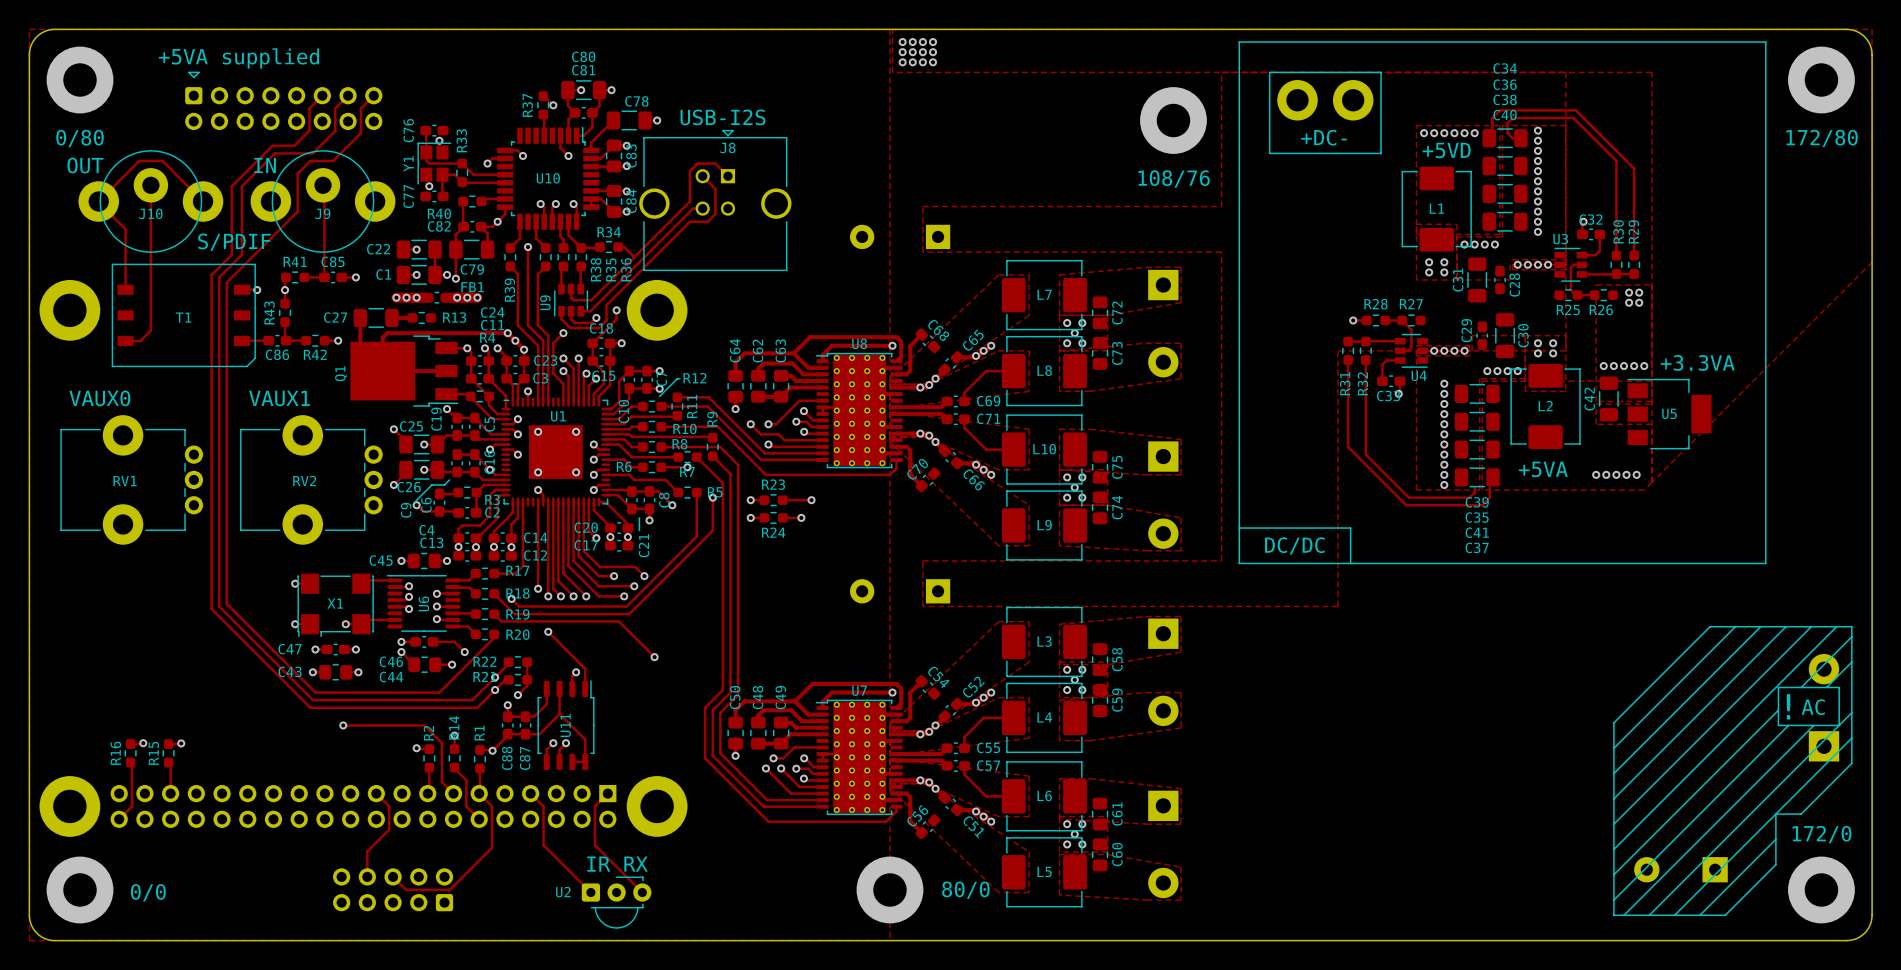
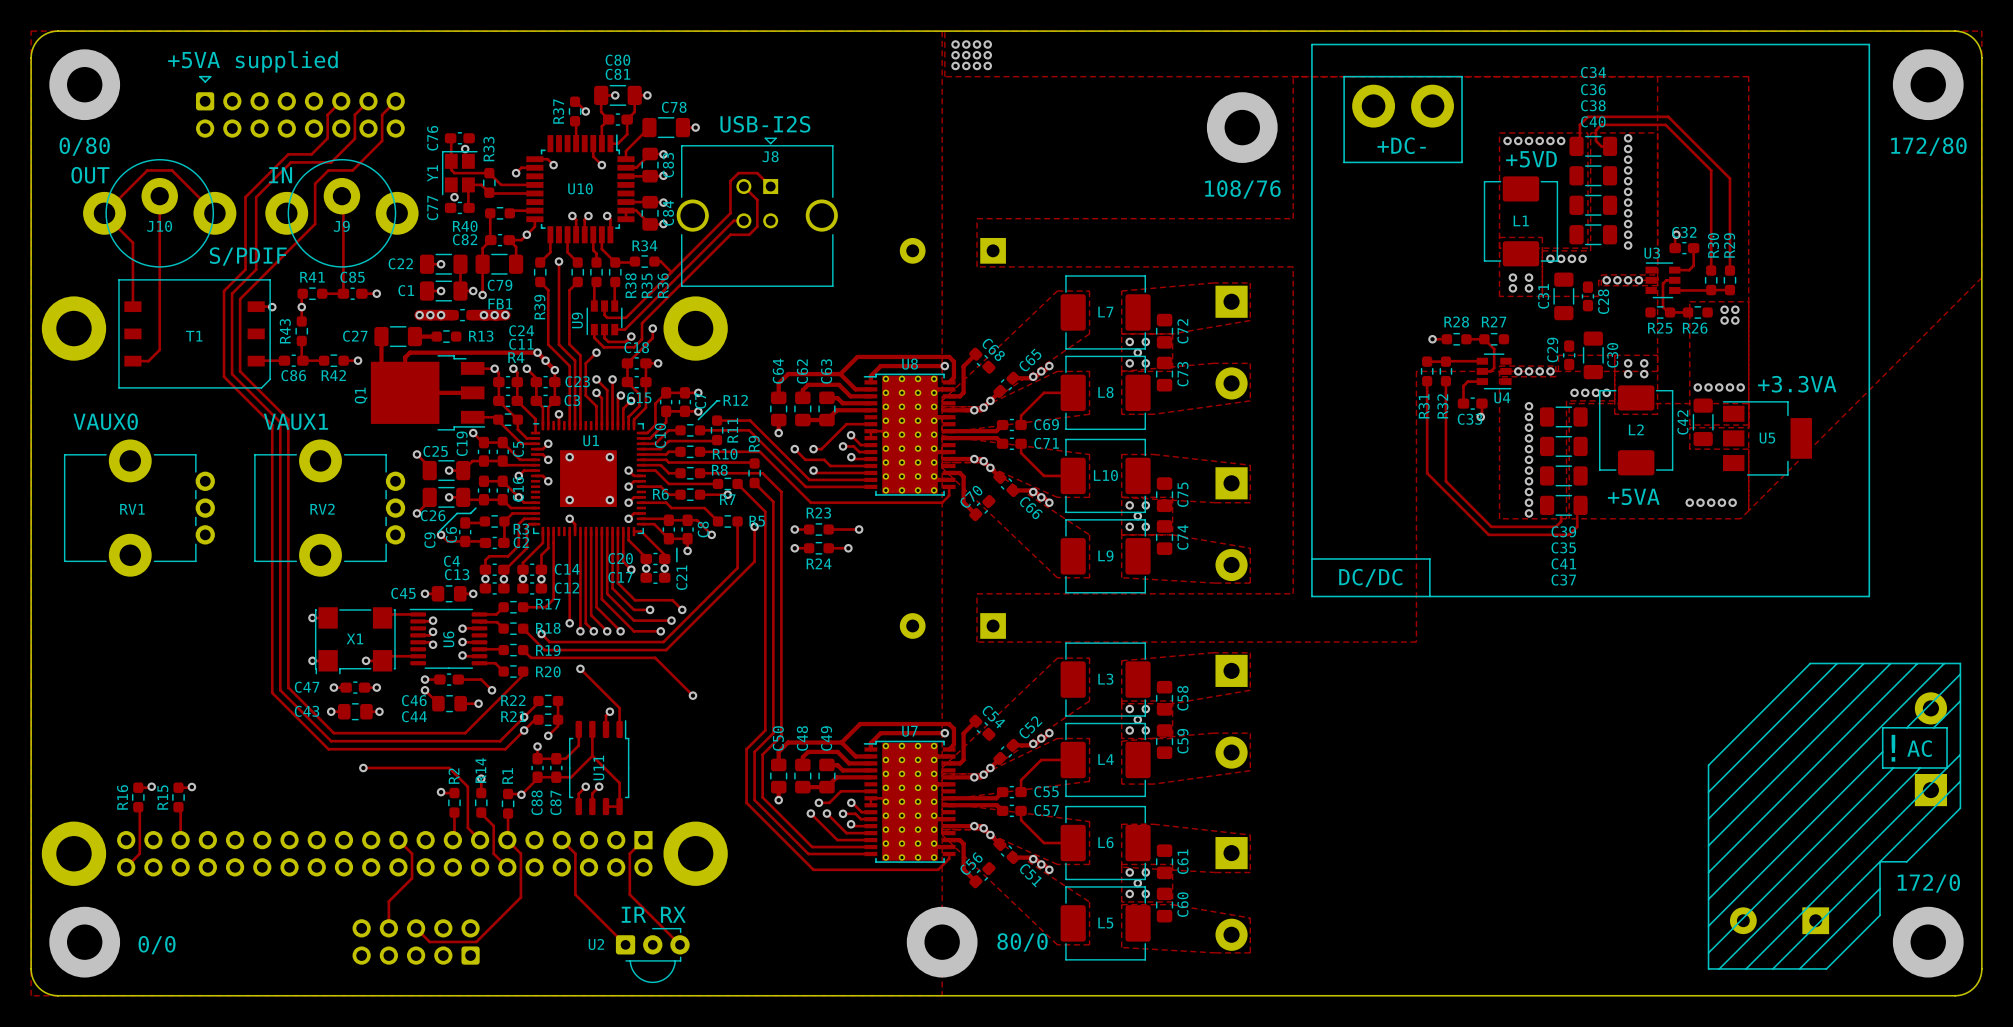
track: (226, 350) (226, 603) (272, 649) -> (240, 371) (288, 419) (288, 687)
track: (219, 353) (219, 606) (264, 652) -> (232, 374) (280, 422) (280, 690)
track: (211, 355) (211, 609) (257, 654) -> (224, 376) (272, 425) (272, 692)

